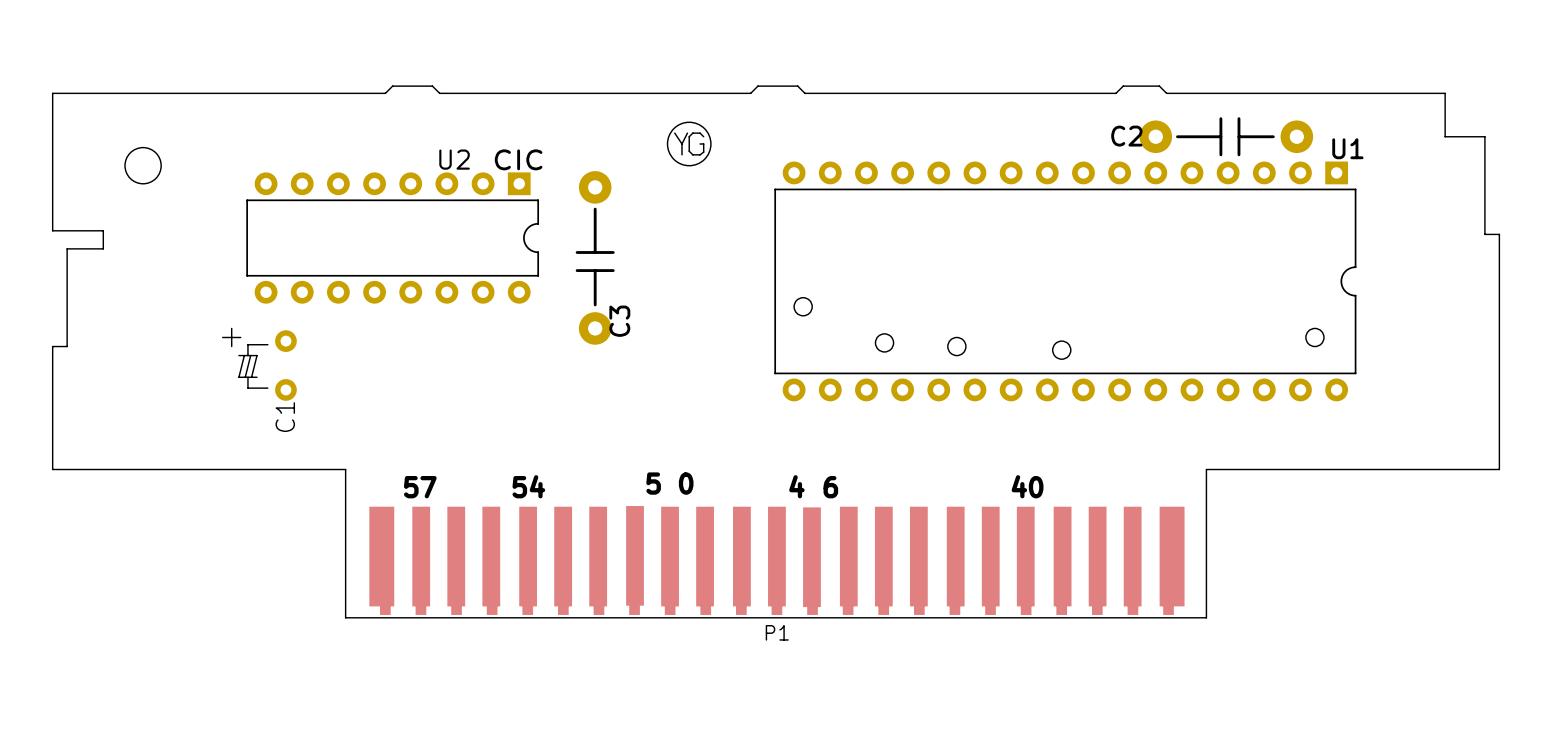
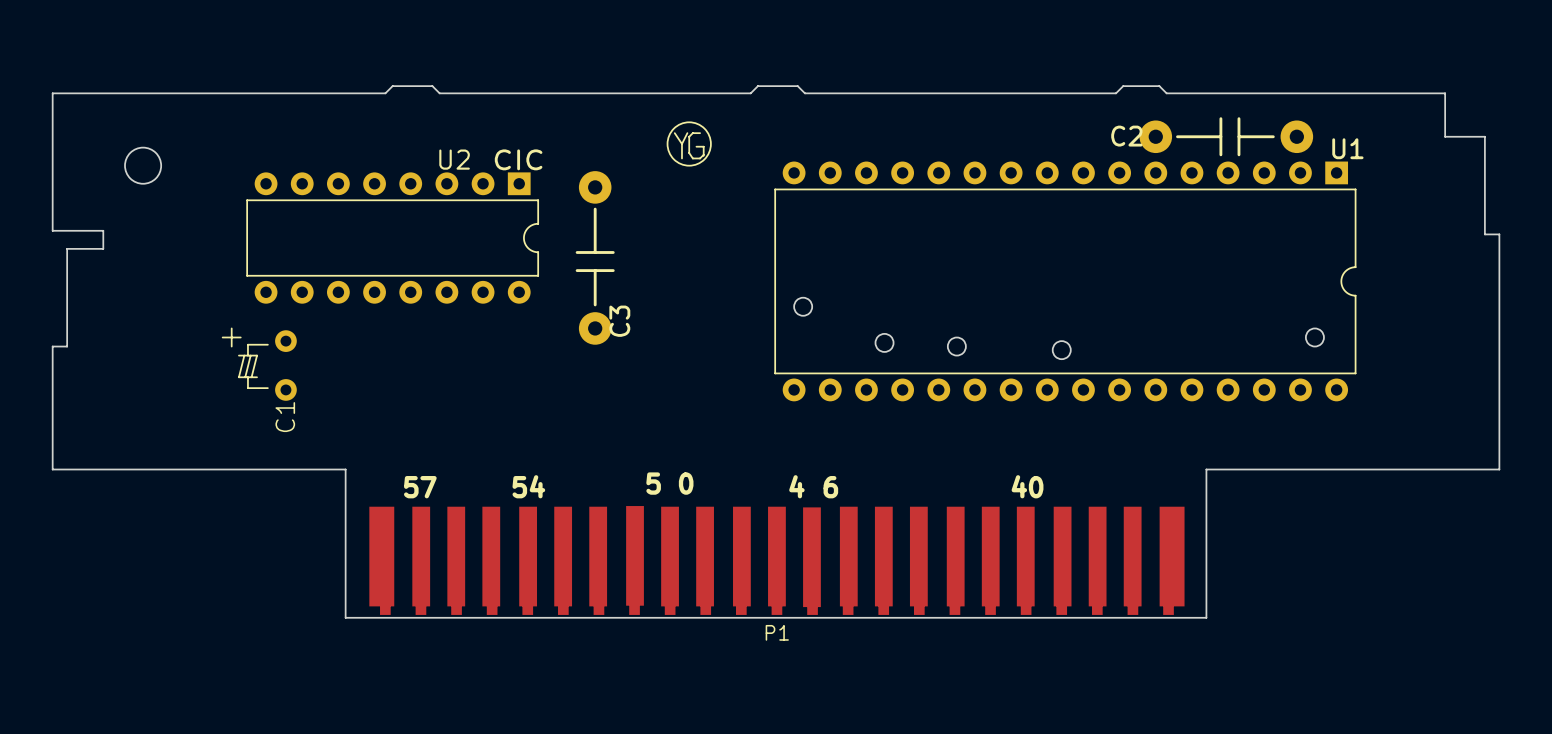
drawing shape: [666, 121, 712, 167] -> [666, 121, 712, 167]

